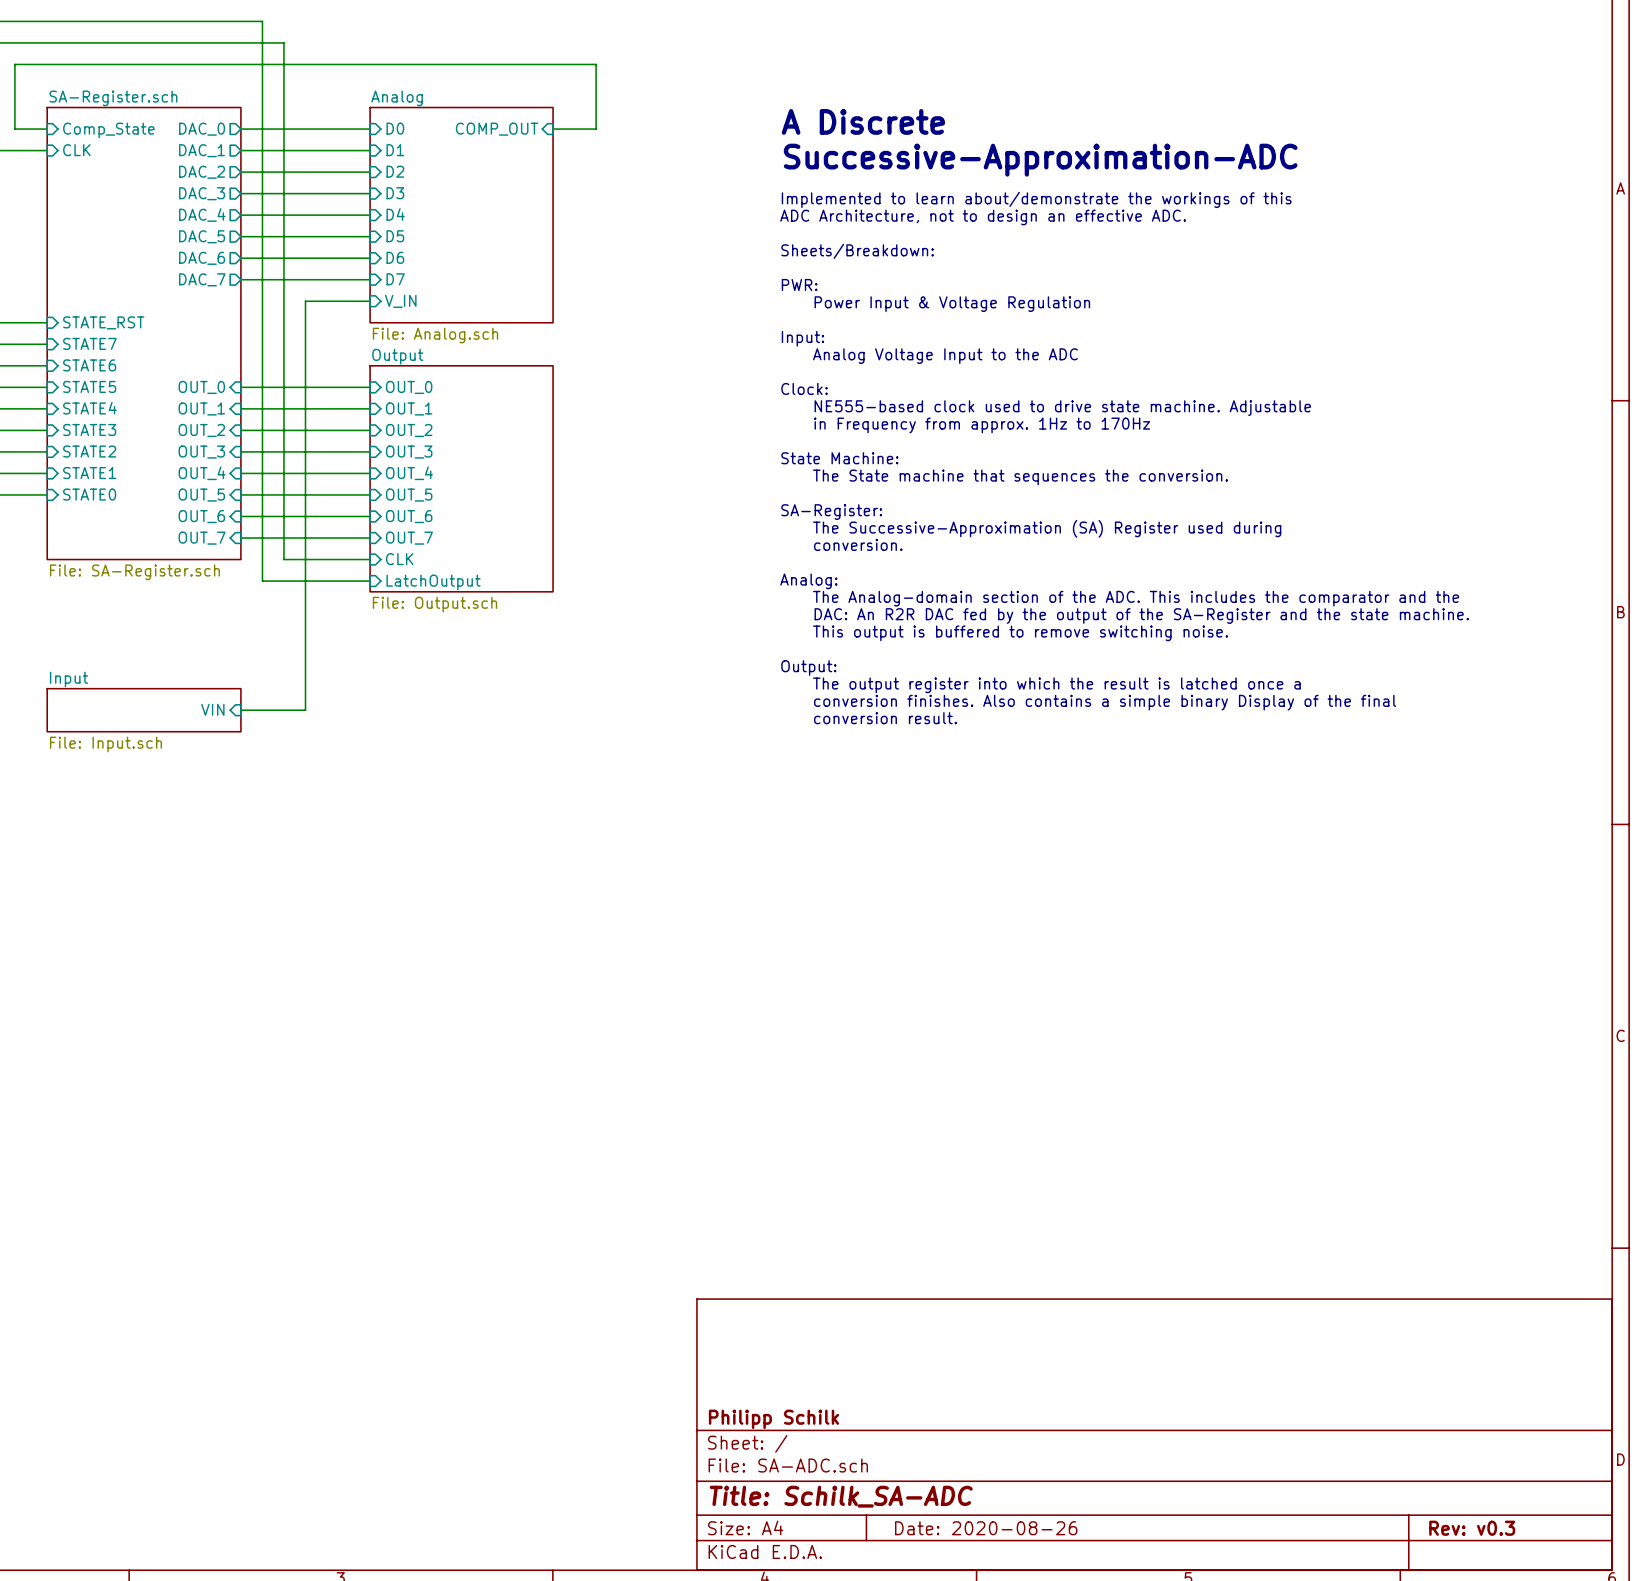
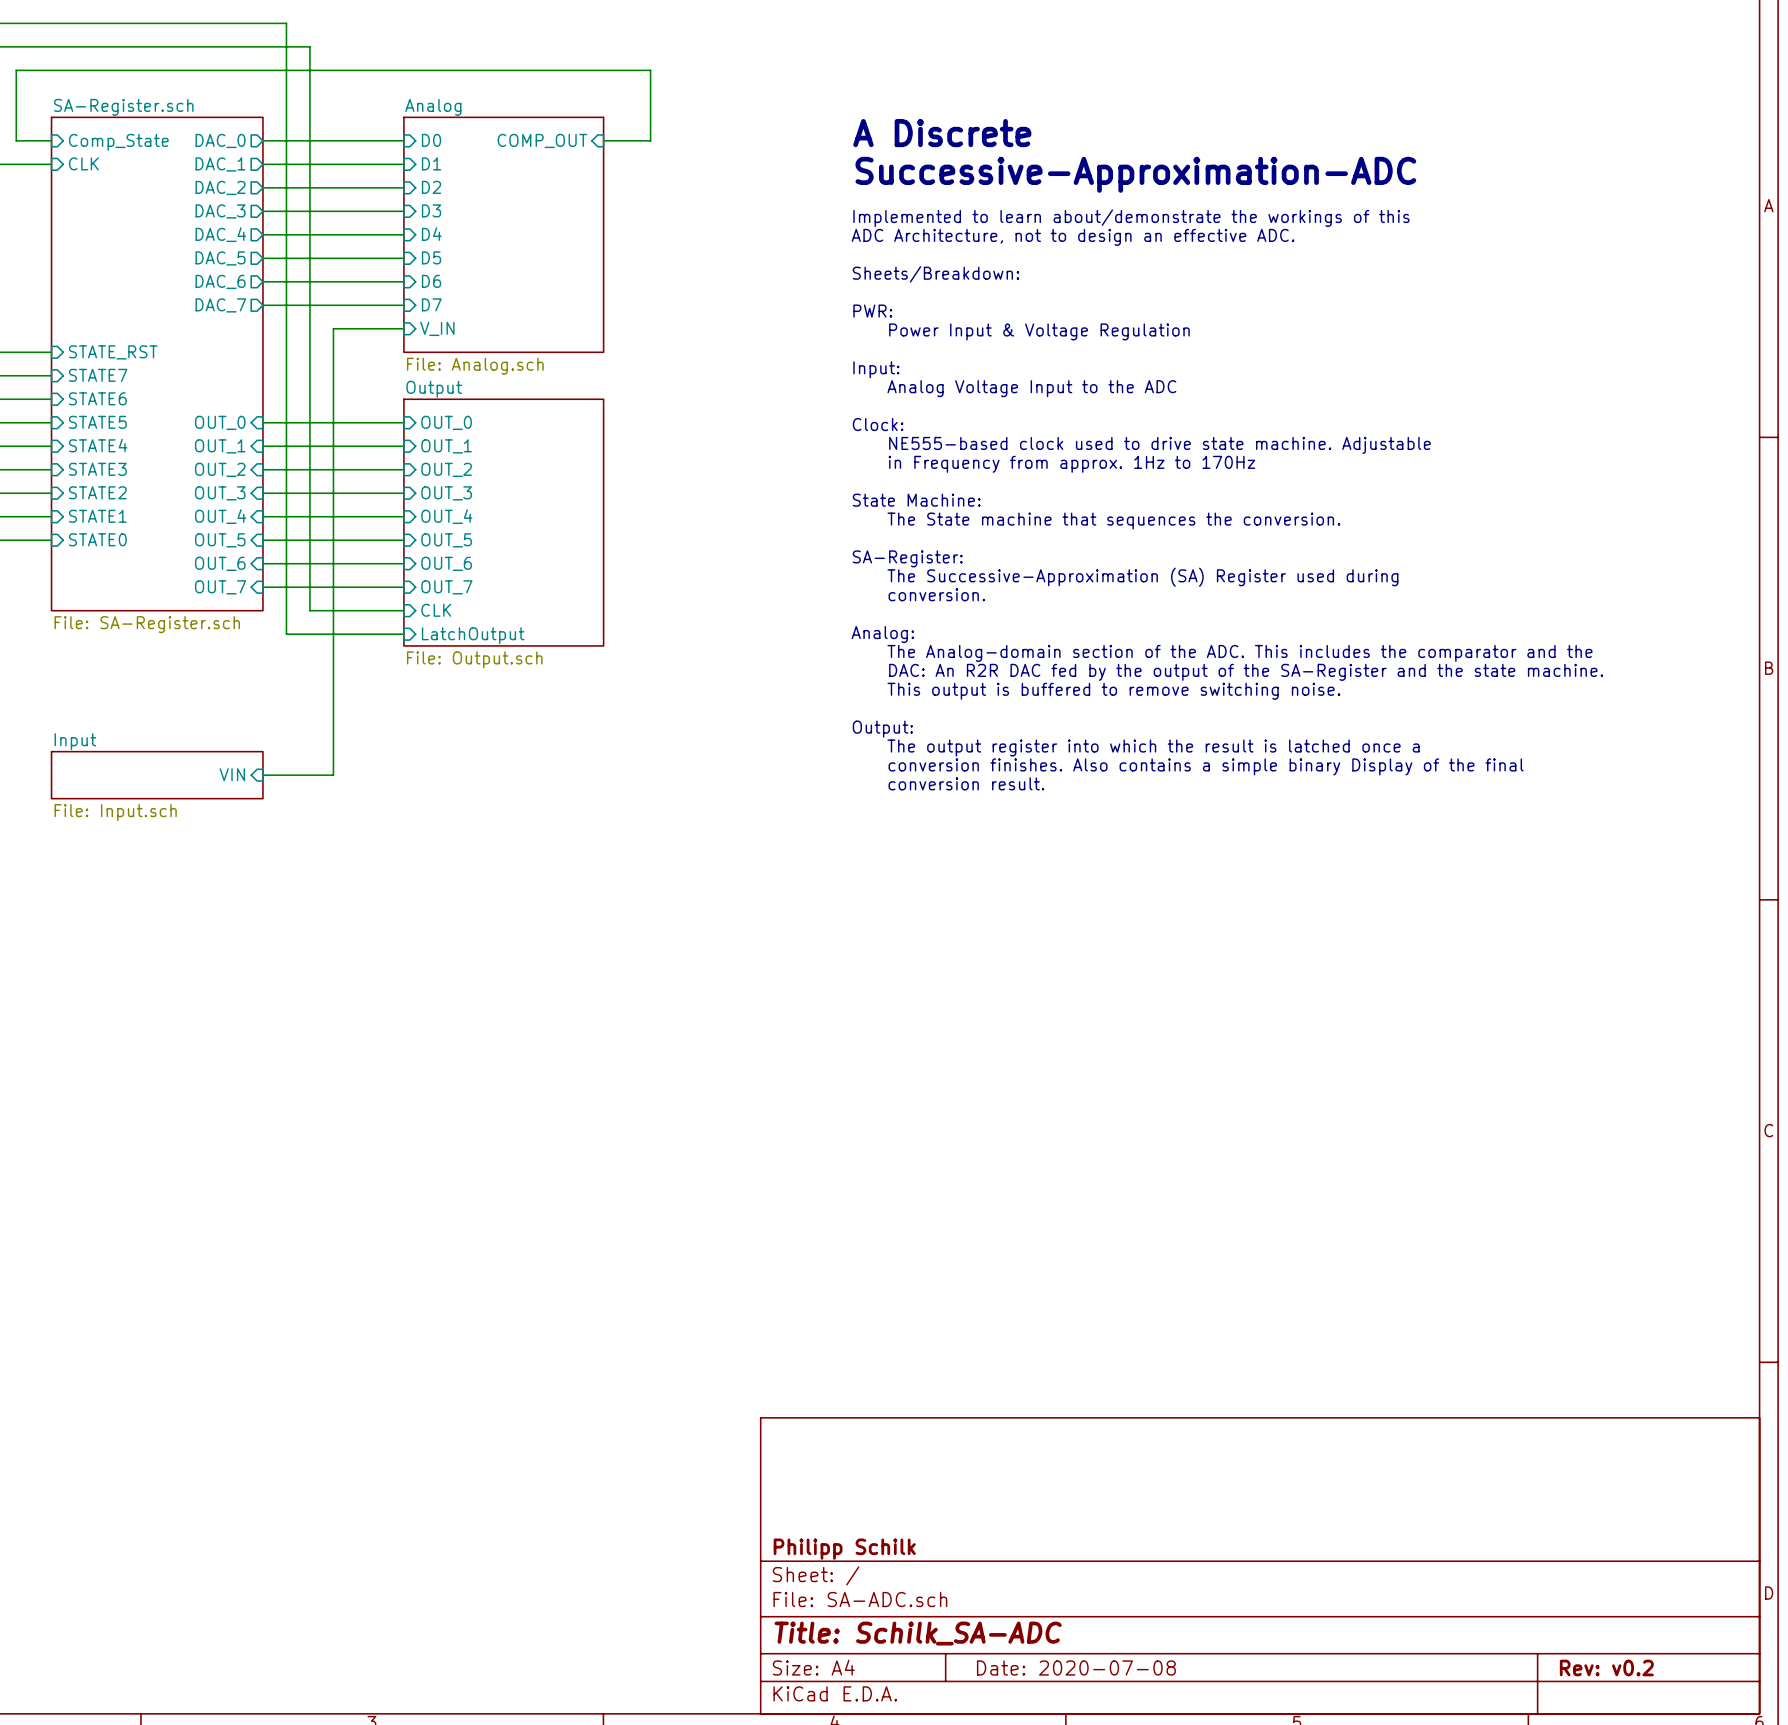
title block: Date: 2020-08-26 (986, 1528) -> Date: 2020-07-08 (1076, 1667)
title block: Rev: v0.3 (1472, 1528) -> Rev: v0.2 (1606, 1667)

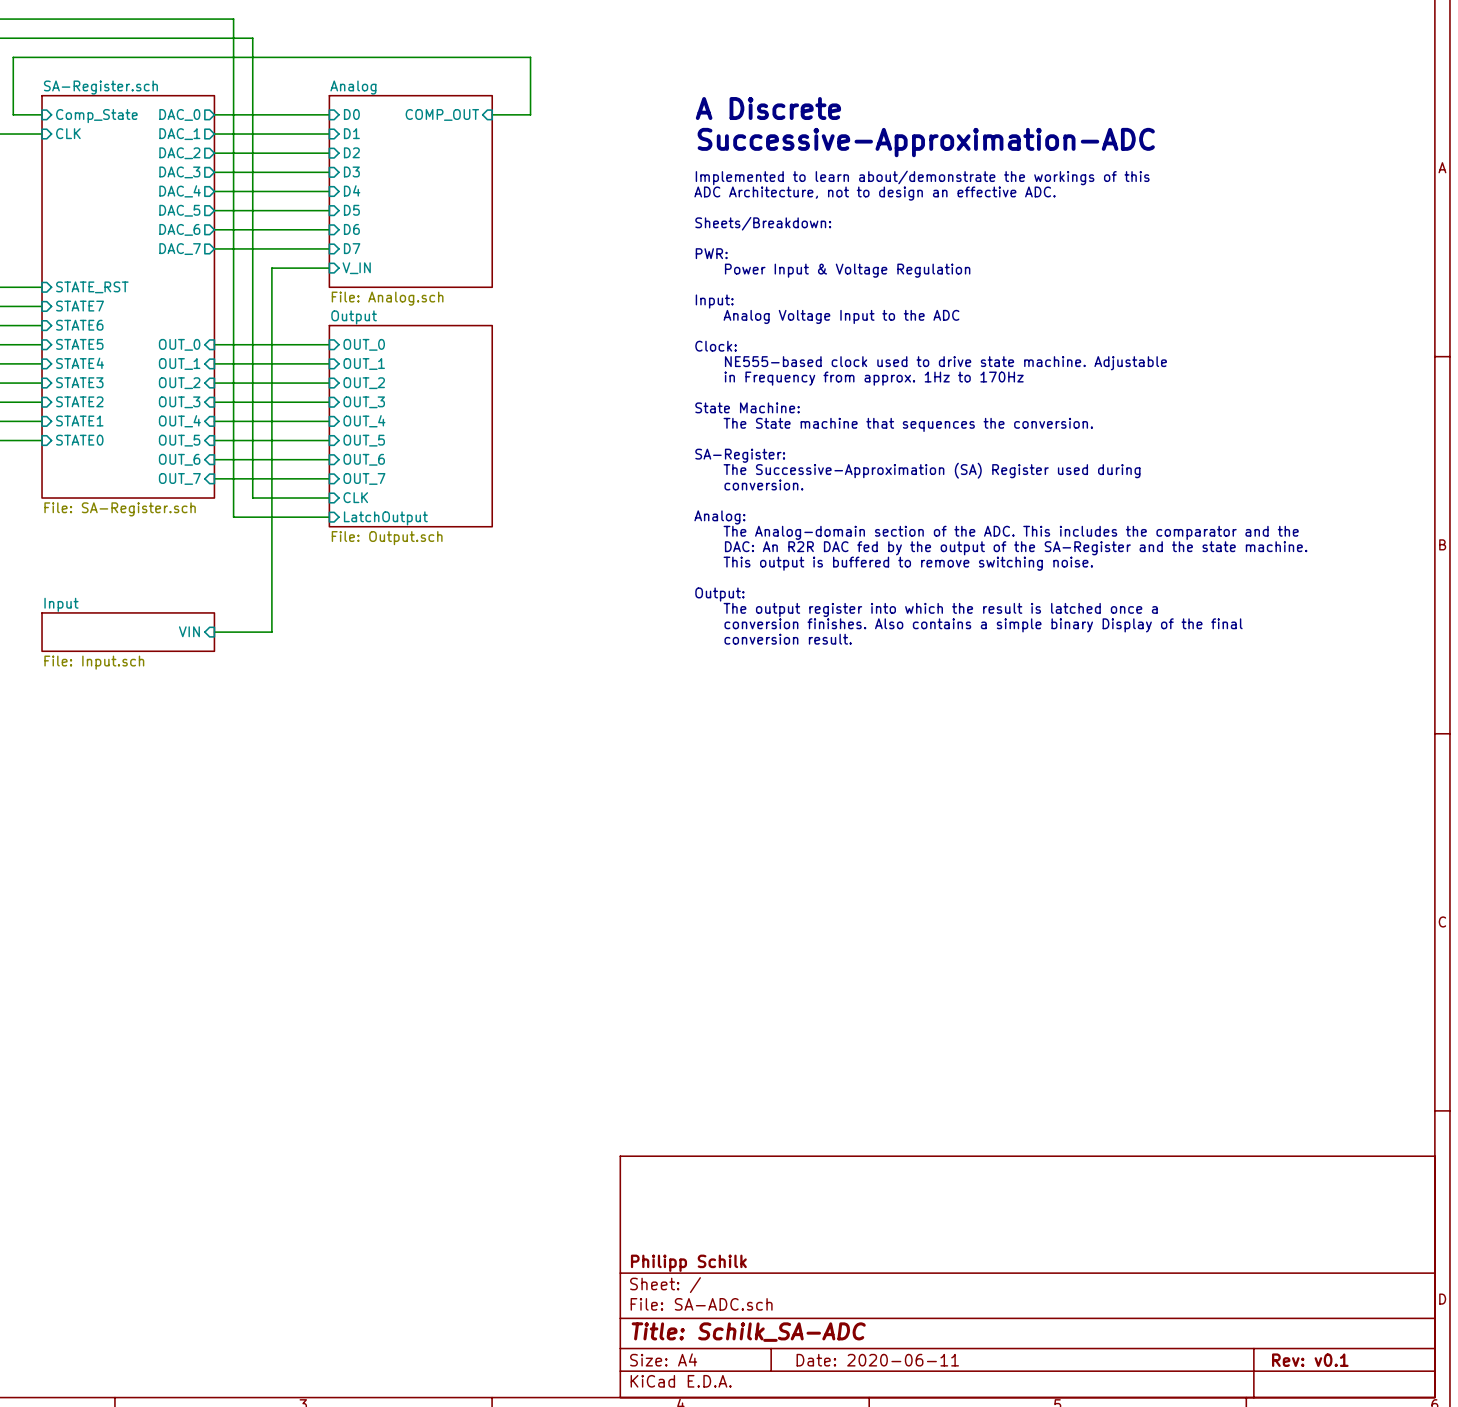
title block: Date: 2020-07-08 (1076, 1667) -> Date: 2020-06-11 (877, 1360)
title block: Rev: v0.2 (1606, 1667) -> Rev: v0.1 (1310, 1360)

